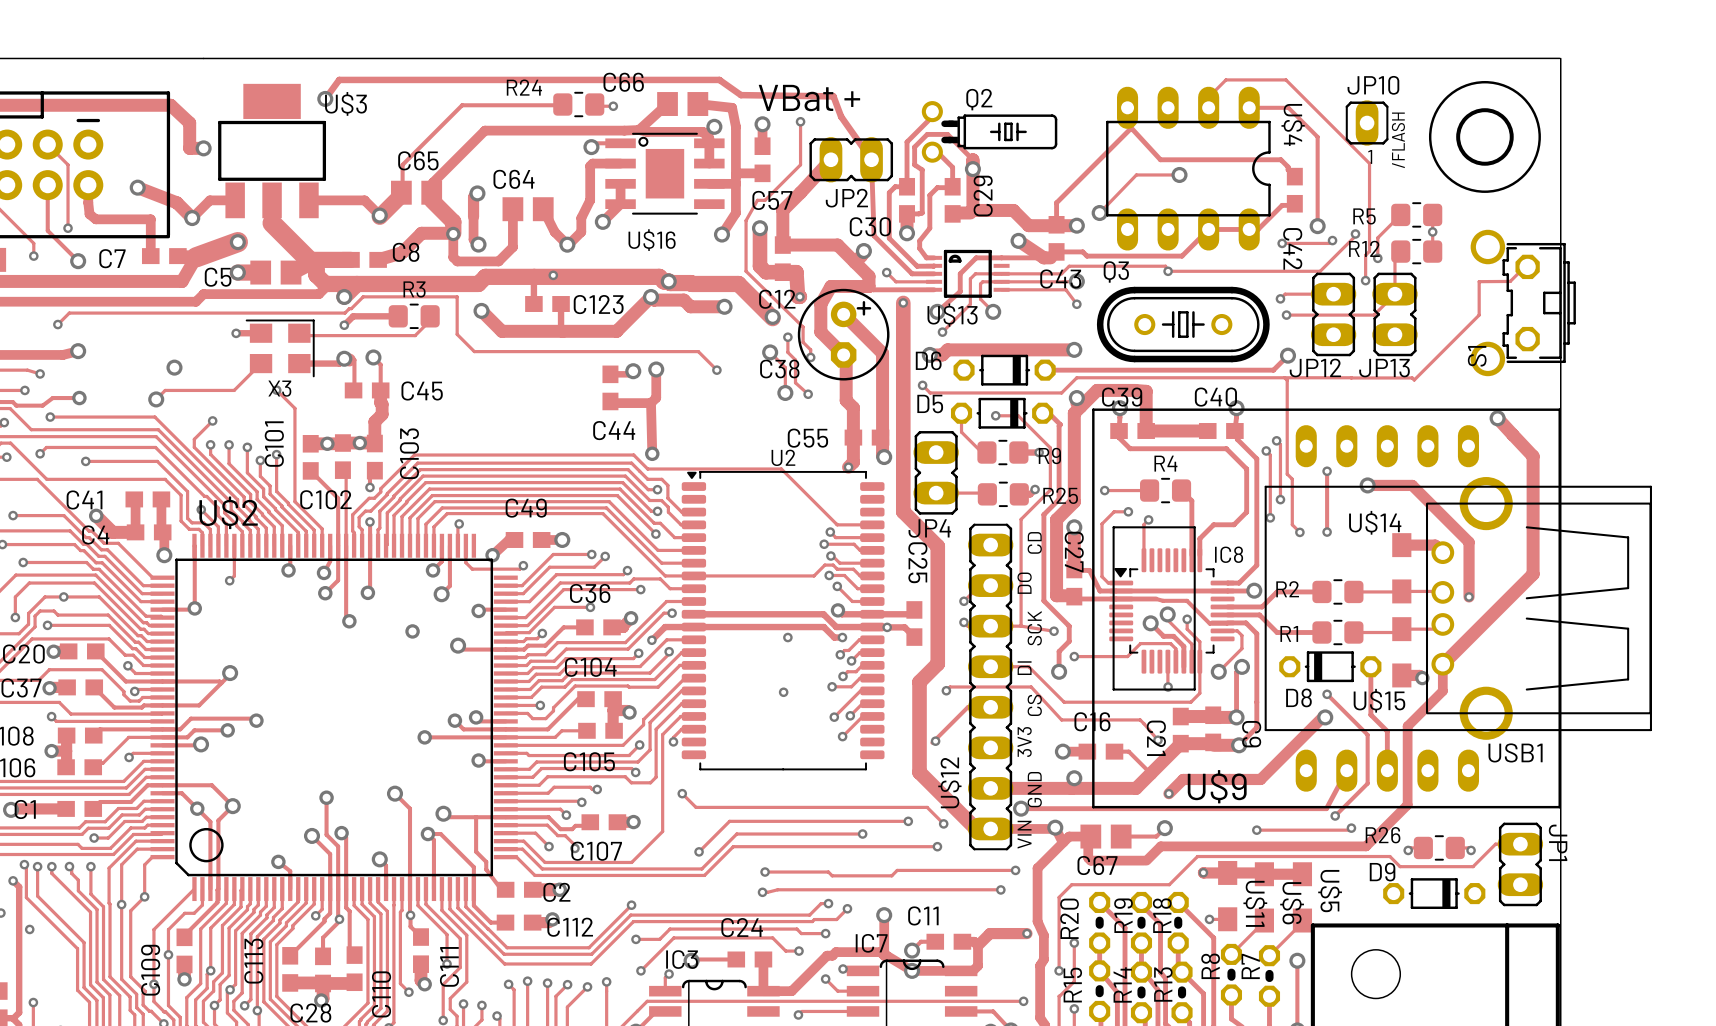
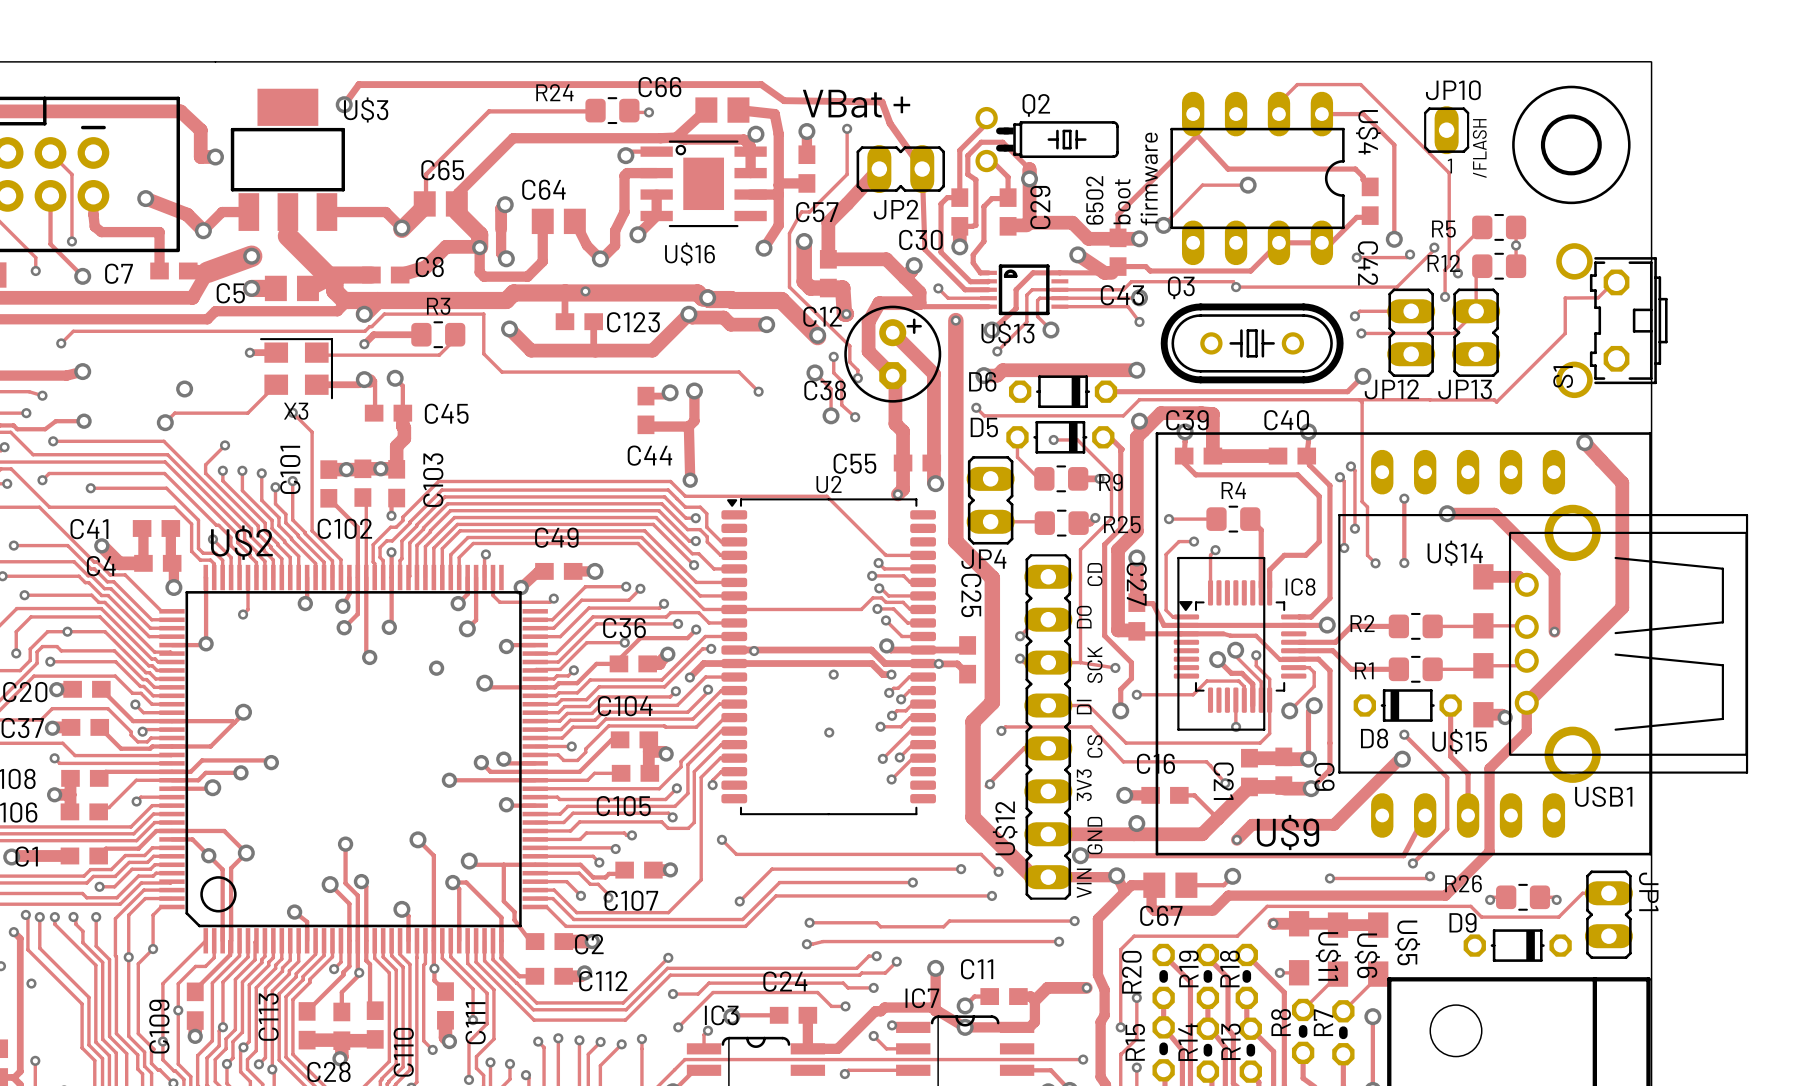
text: none -> firmware (1149, 179)
text: none -> 6502 (1094, 200)
text: none -> boot (1122, 201)
track: none -> (696, 629) (687, 638) (640, 638) (618, 659) (618, 663)
via: none -> (696, 629)
via: none -> (754, 651)

